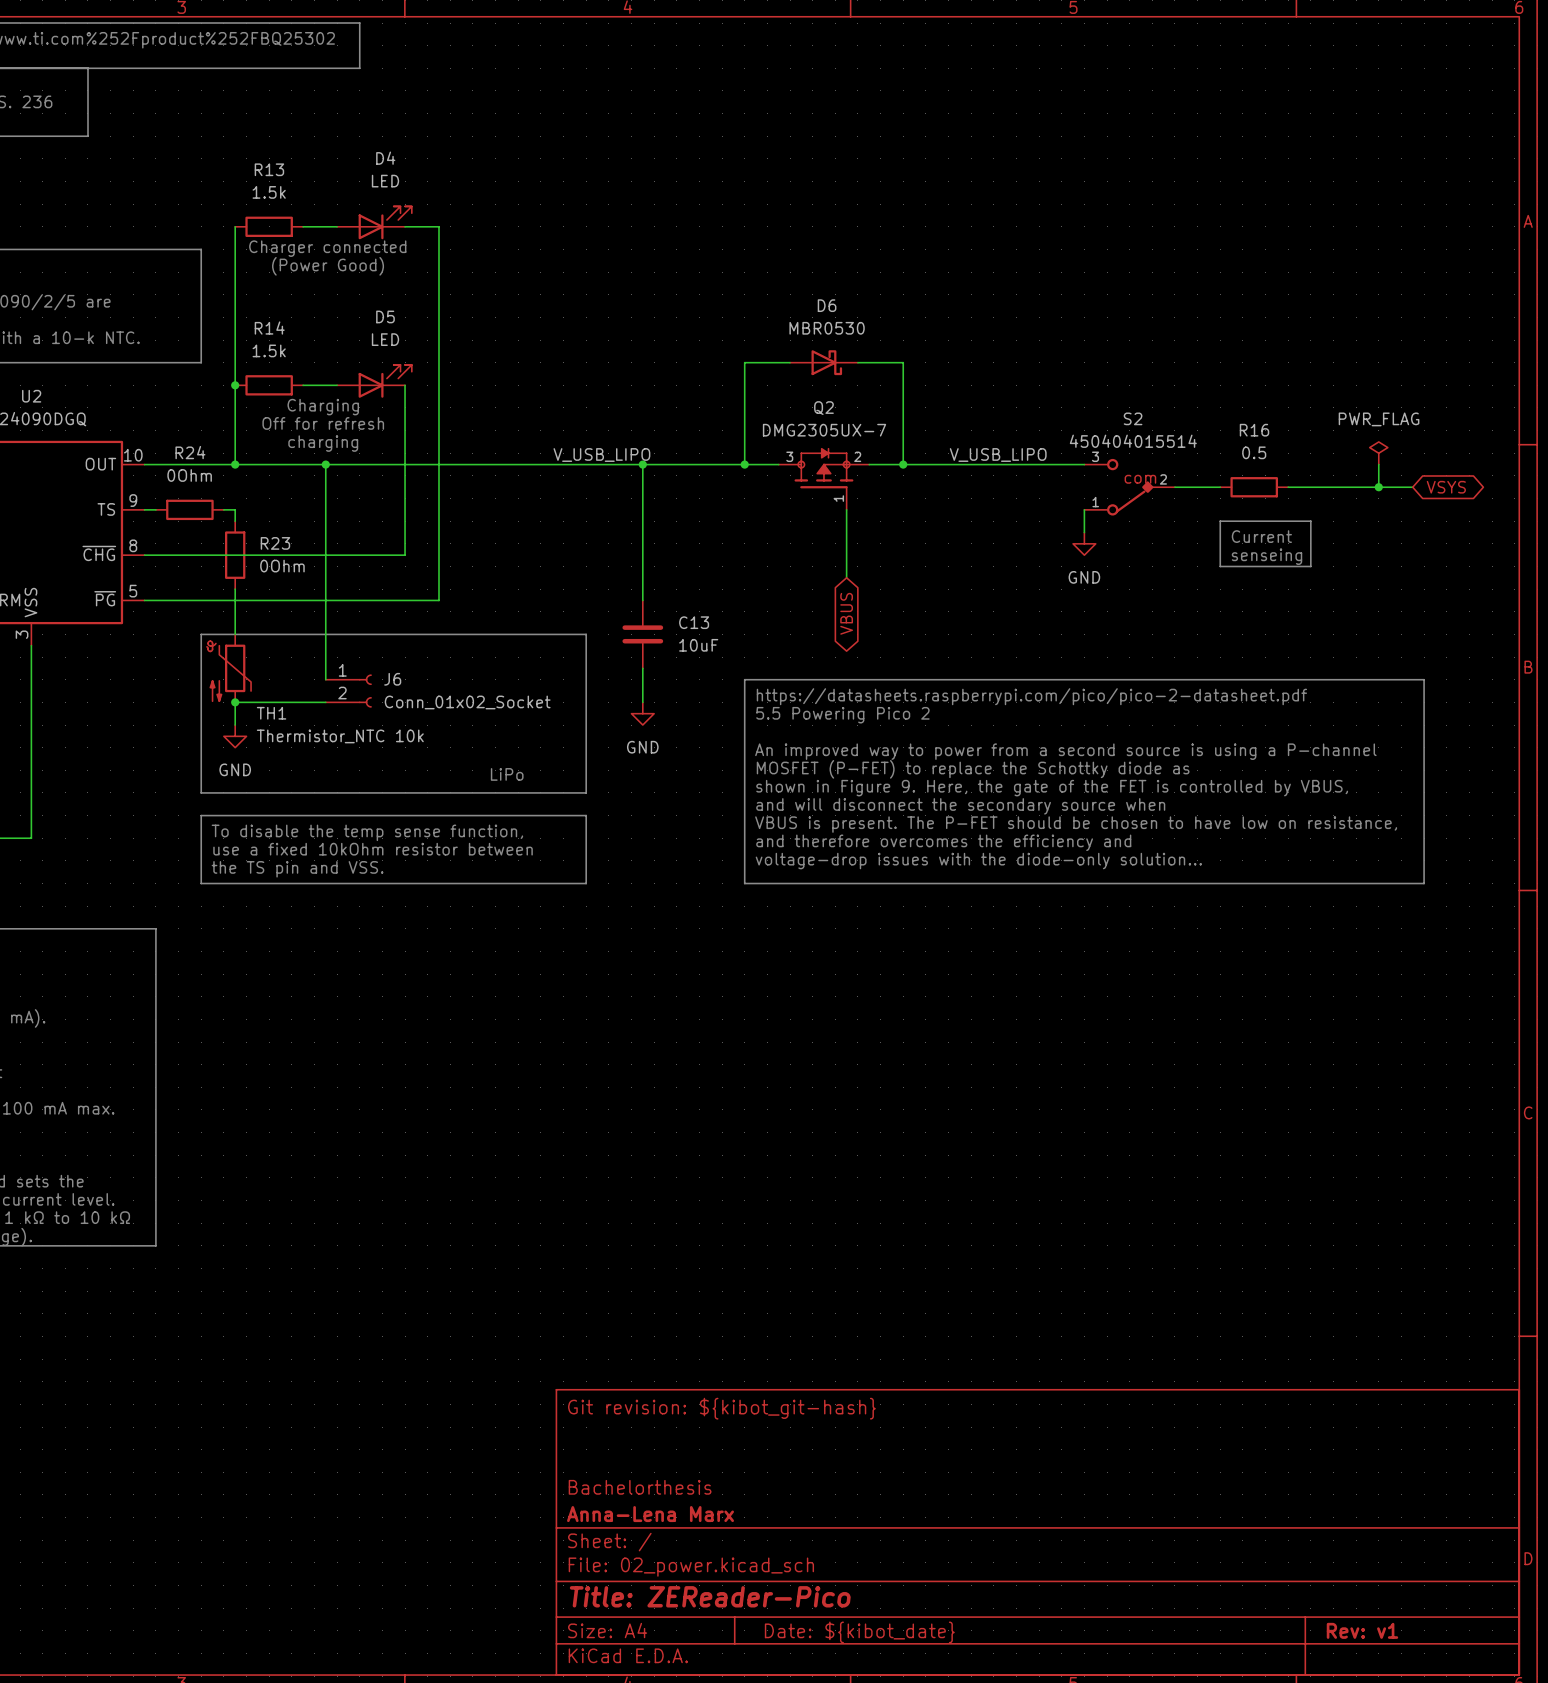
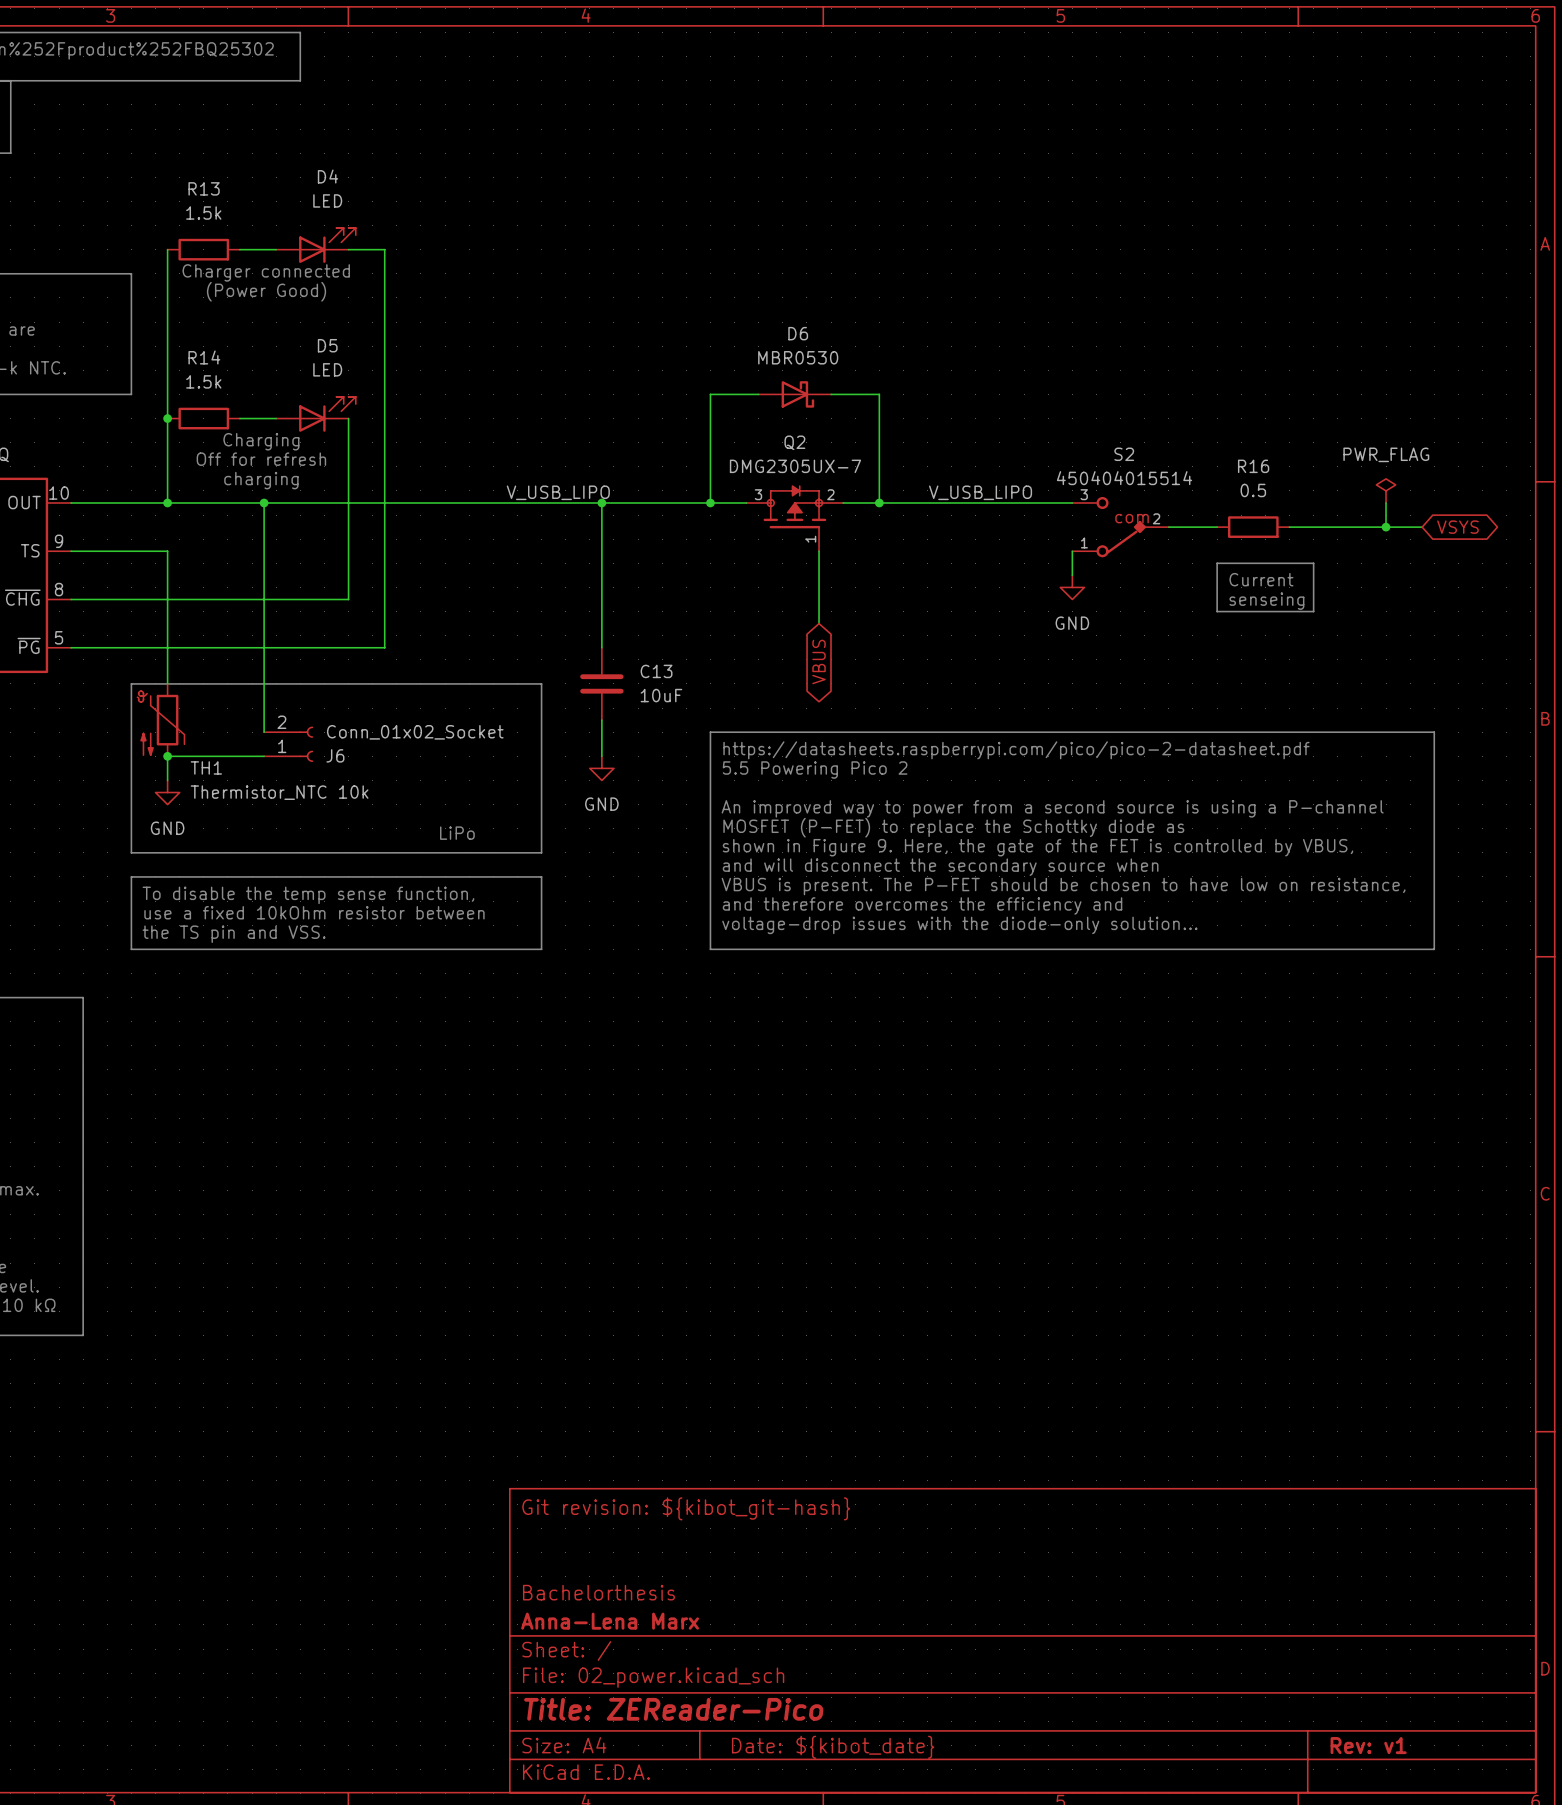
wire: none -> (83, 551) (155, 551)
R24: 0Ohm (189, 509) -> none
wire: none -> (167, 563) (167, 635)
R23: 0Ohm (235, 555) -> none
J6 flip: as is (365, 691) -> up-down (306, 744)

